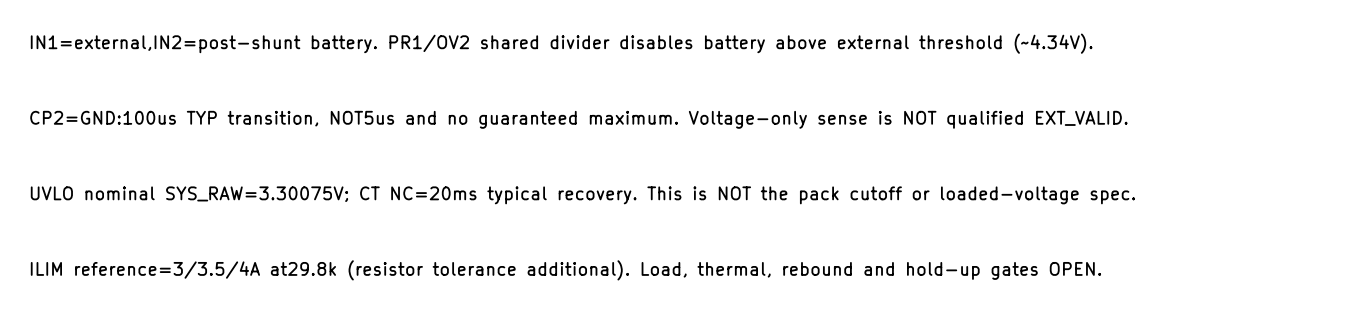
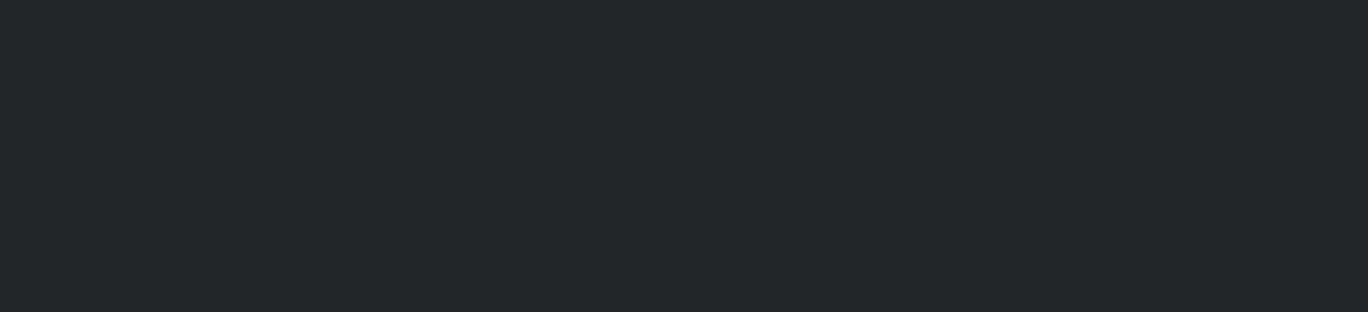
text: IN1=external,IN2=post-shunt battery. PR1/OV2 shared divider disables battery above external threshold (~4.34V). (561, 43) -> none
text: CP2=GND:100us TYP transition, NOT5us and no guaranteed maximum. Voltage-only sense is NOT qualified EXT_VALID. (578, 119) -> none
text: UVLO nominal SYS_RAW=3.30075V; CT NC=20ms typical recovery. This is NOT the pack cutoff or loaded-voltage spec. (582, 195) -> none
text: ILIM reference=3/3.5/4A at29.8k (resistor tolerance additional). Load, thermal, rebound and hold-up gates OPEN. (565, 270) -> none

